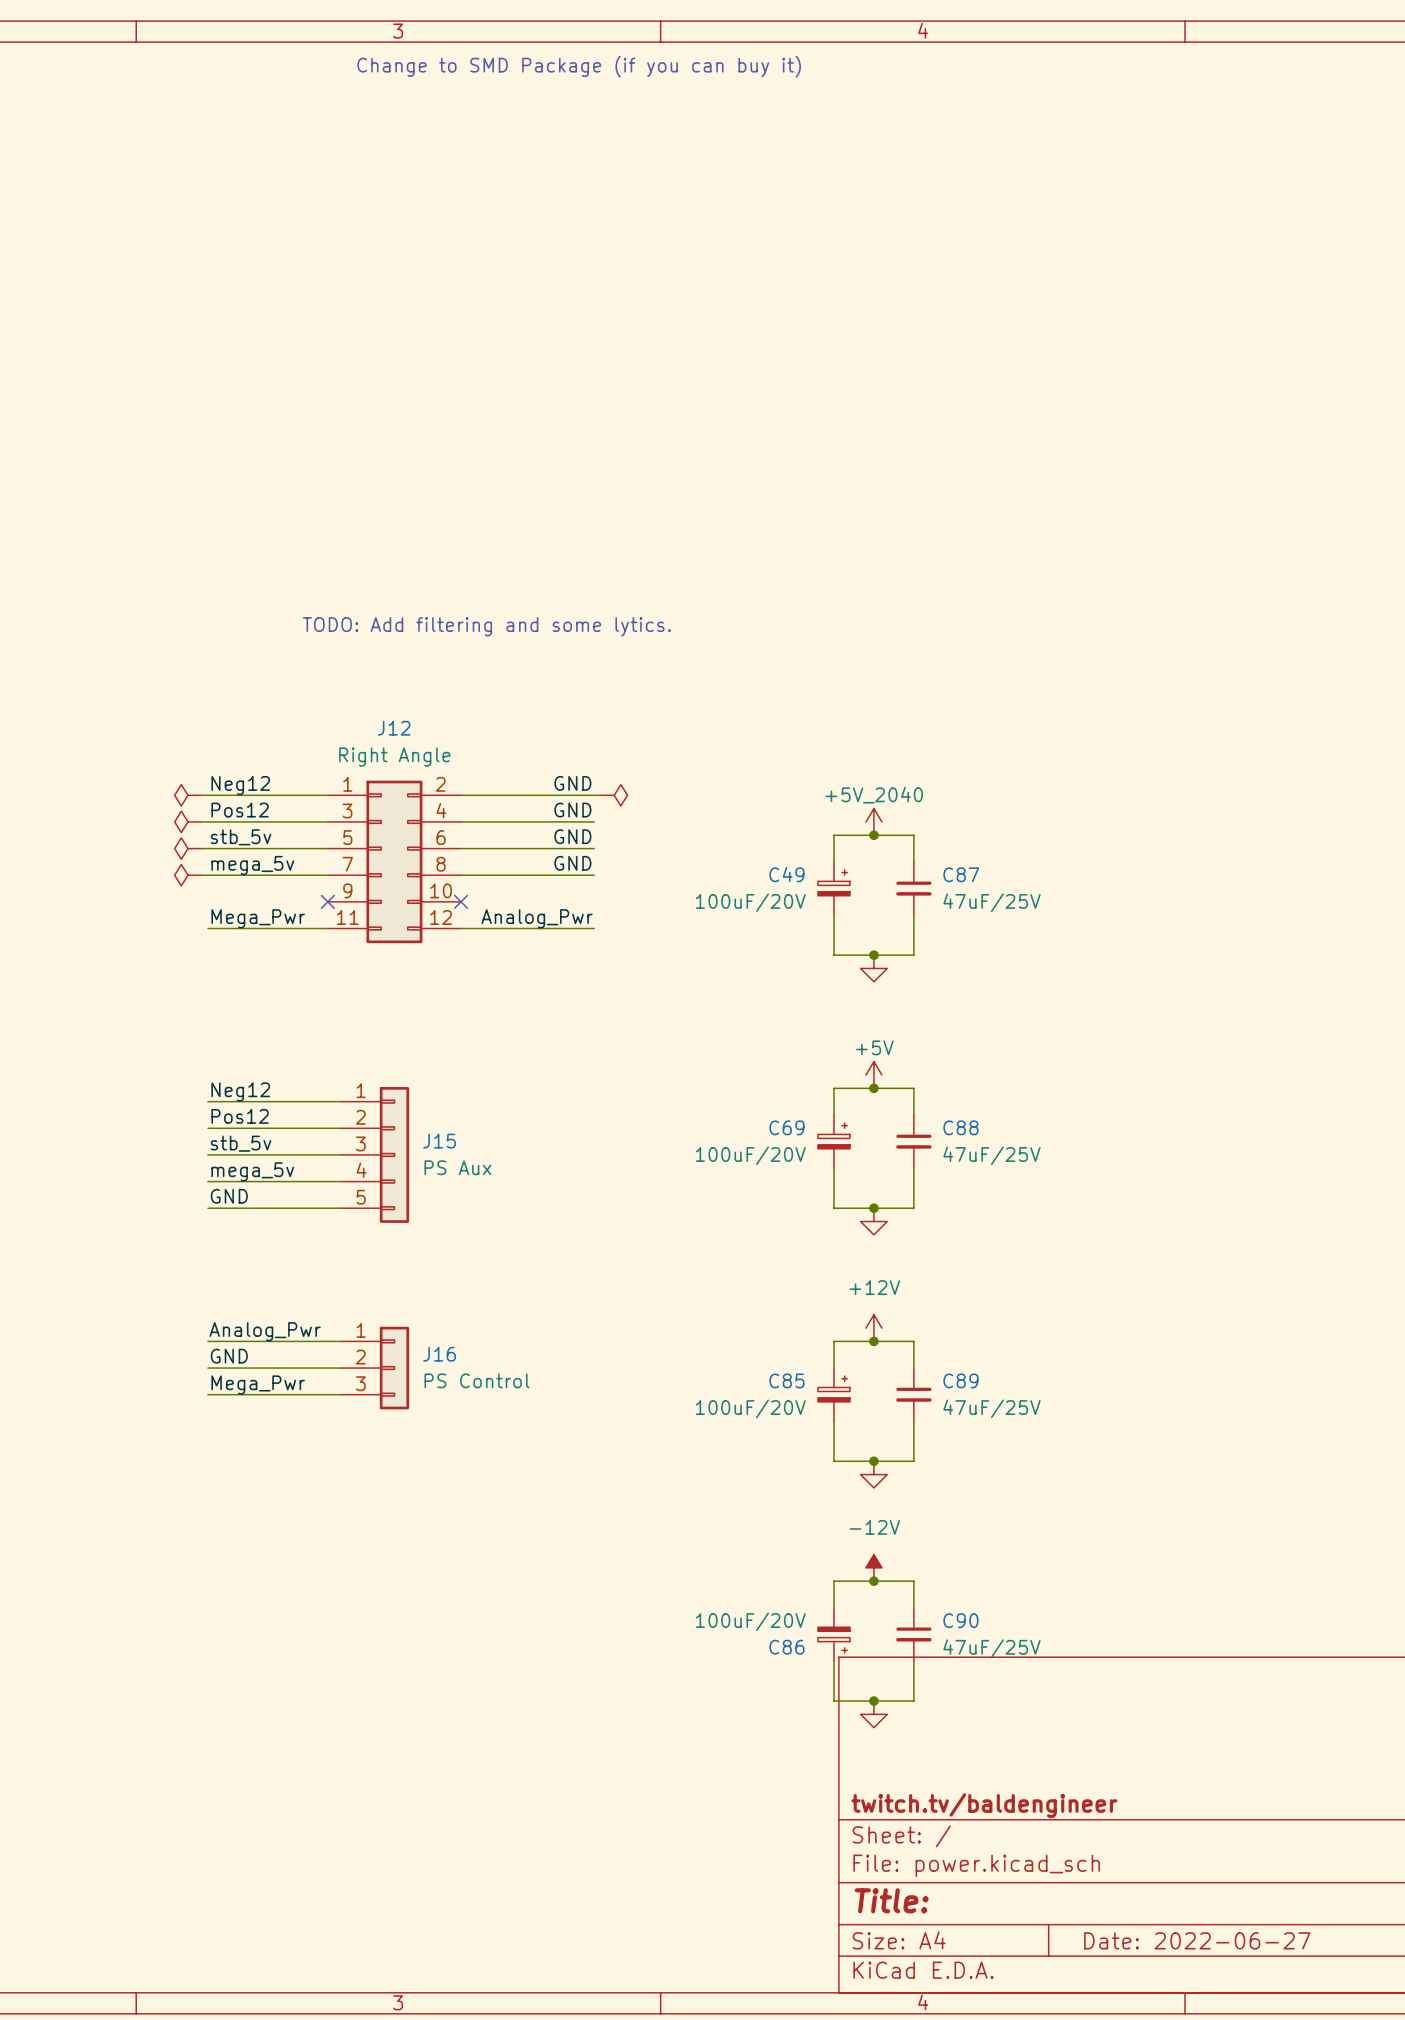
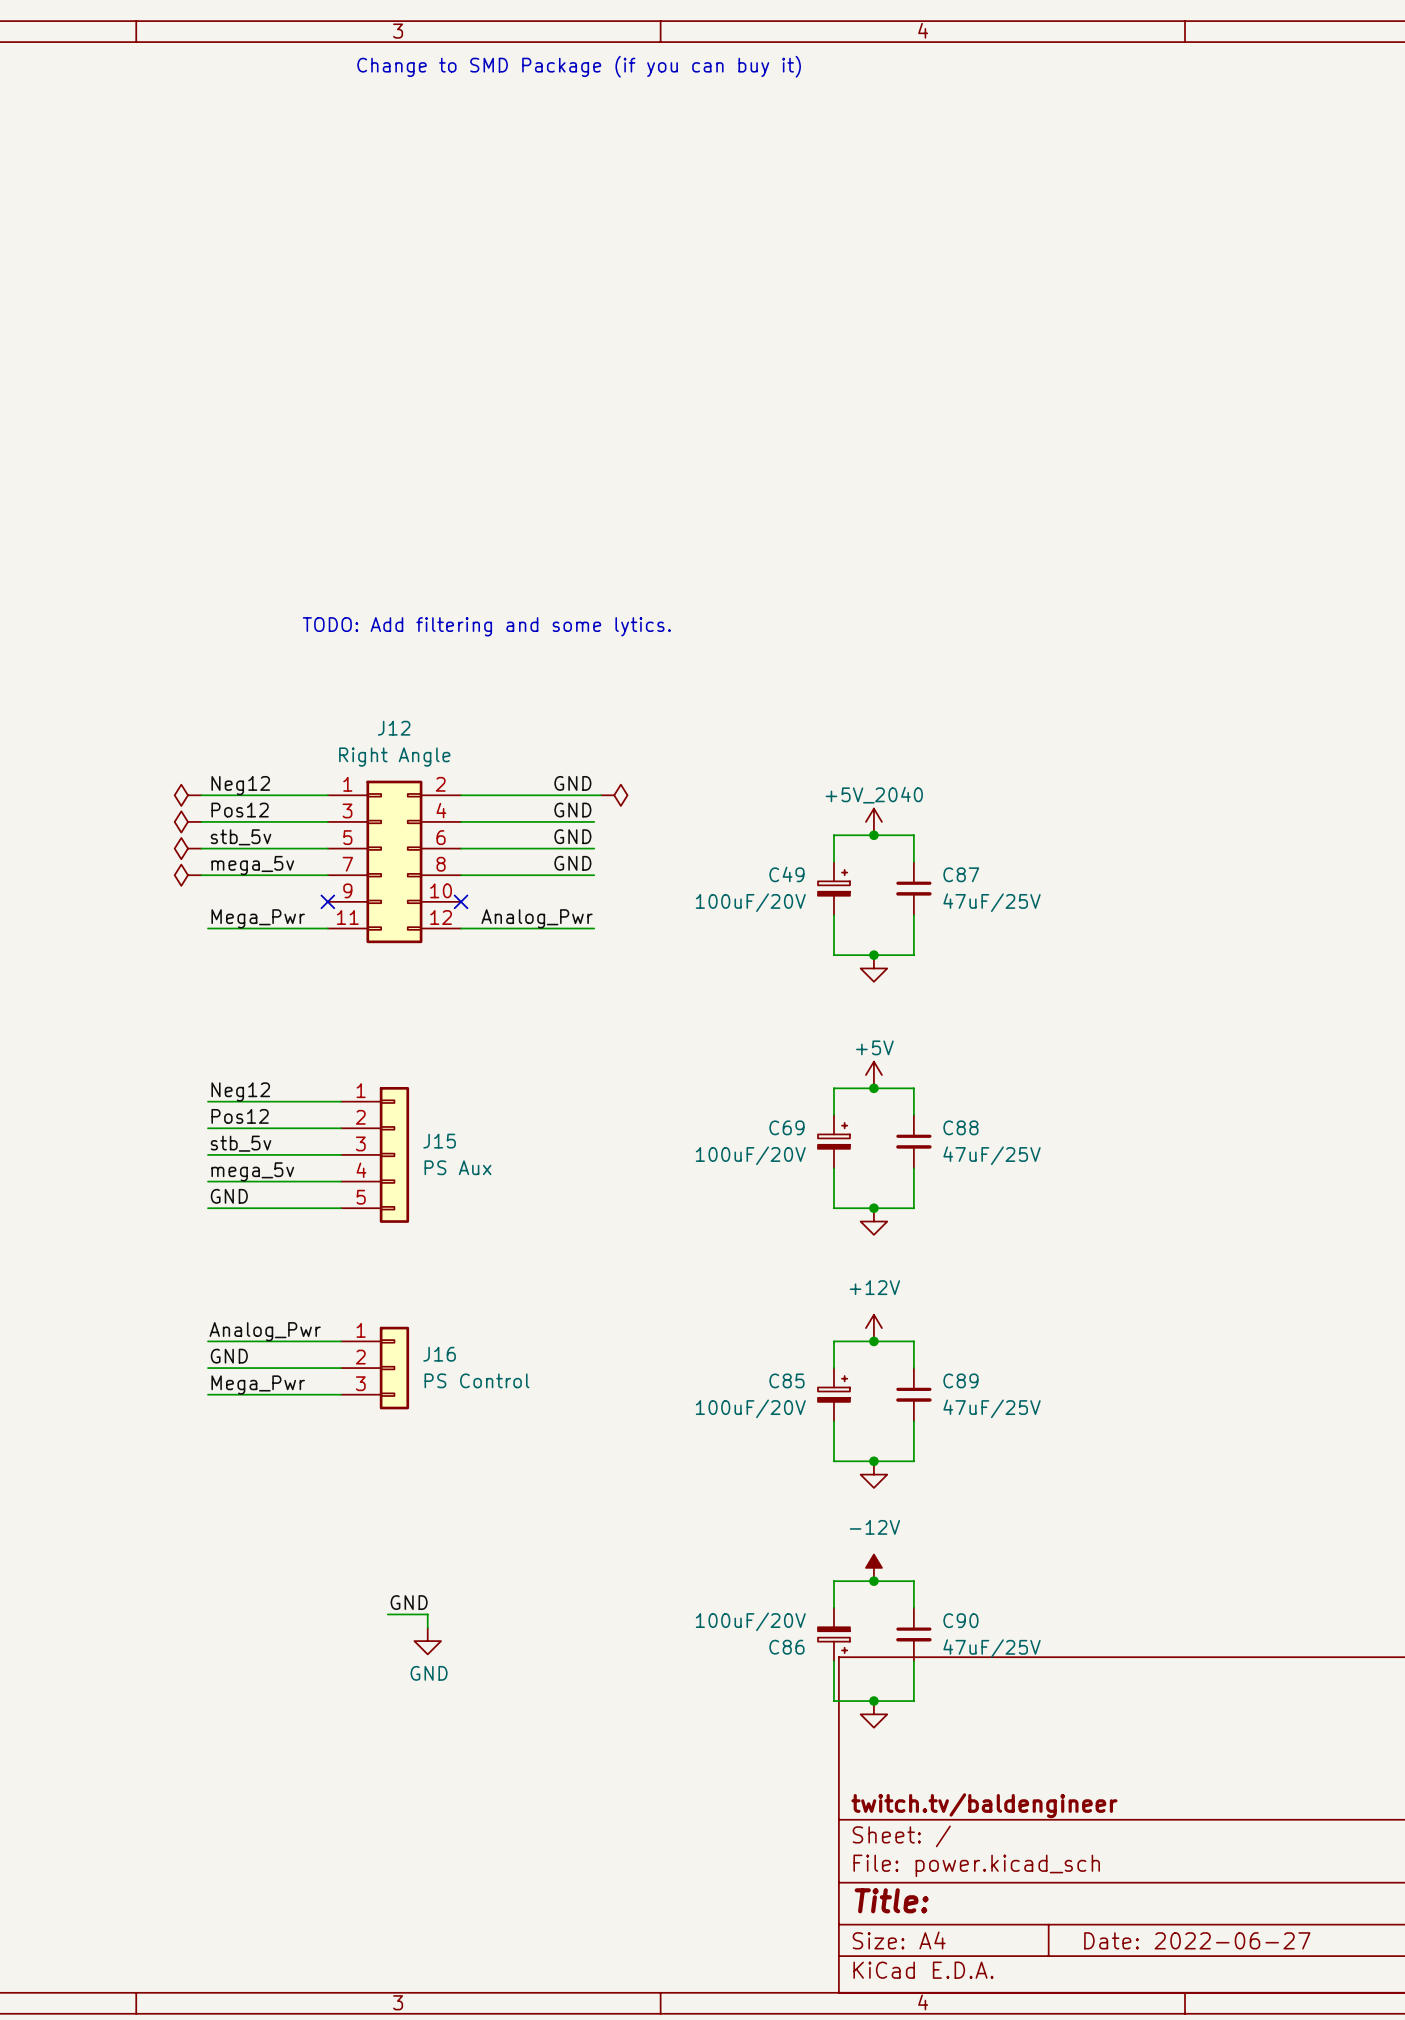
label: none -> GND (409, 1602)
wire: none -> (387, 1614) (427, 1614) (427, 1627)
power symbol: none -> GND (427, 1641)

